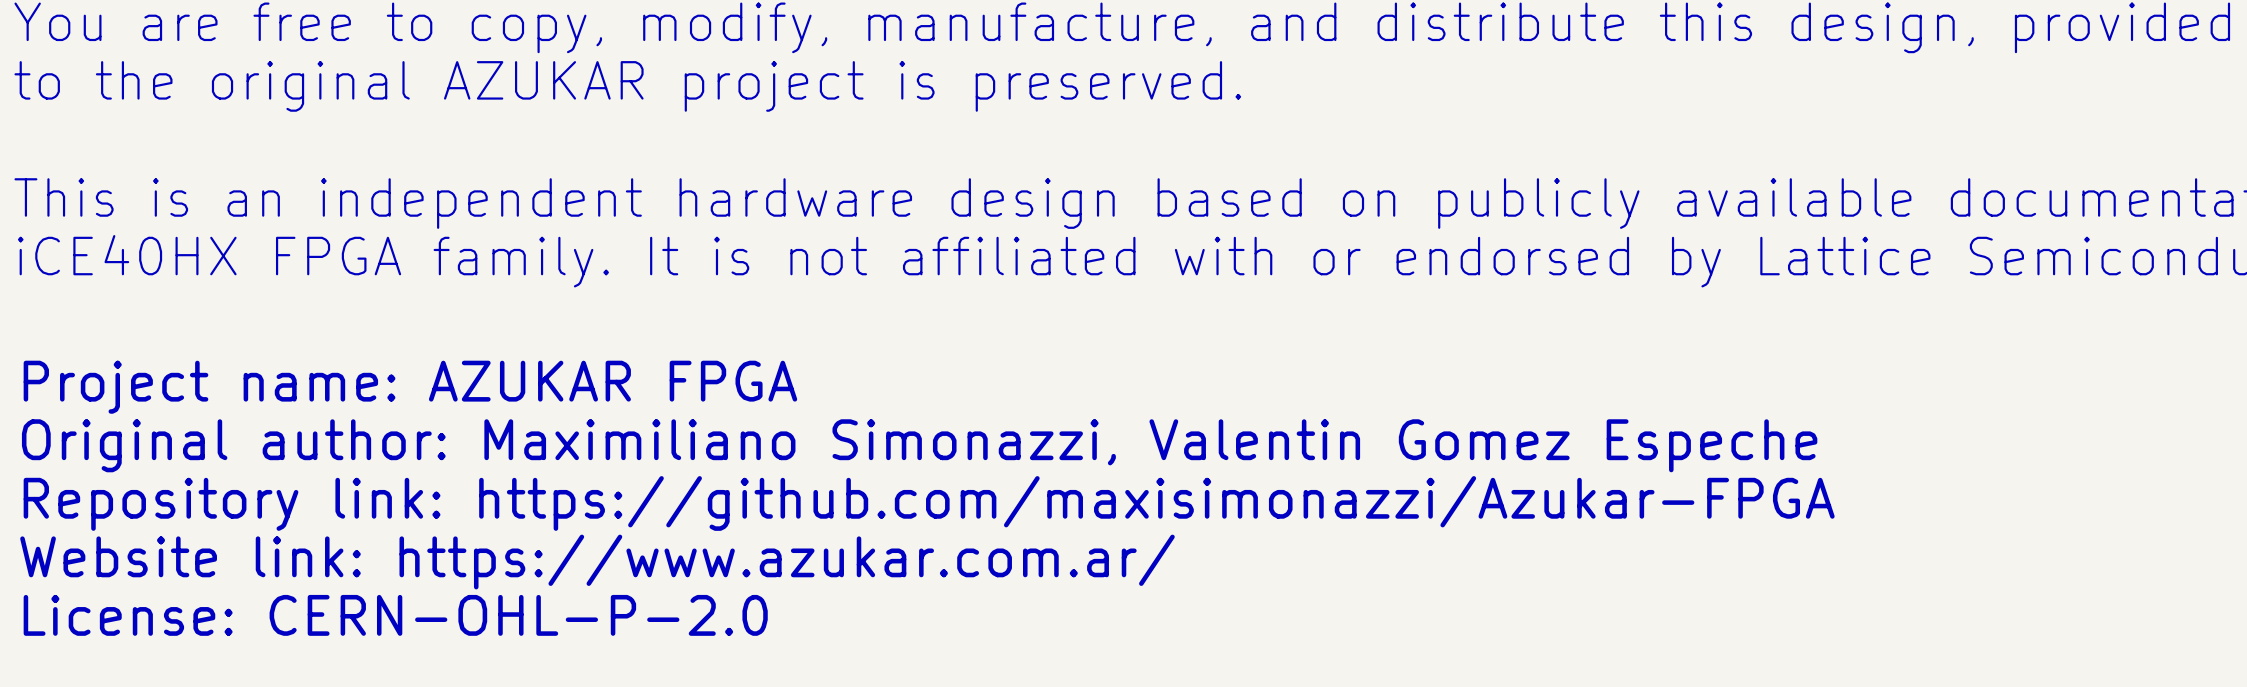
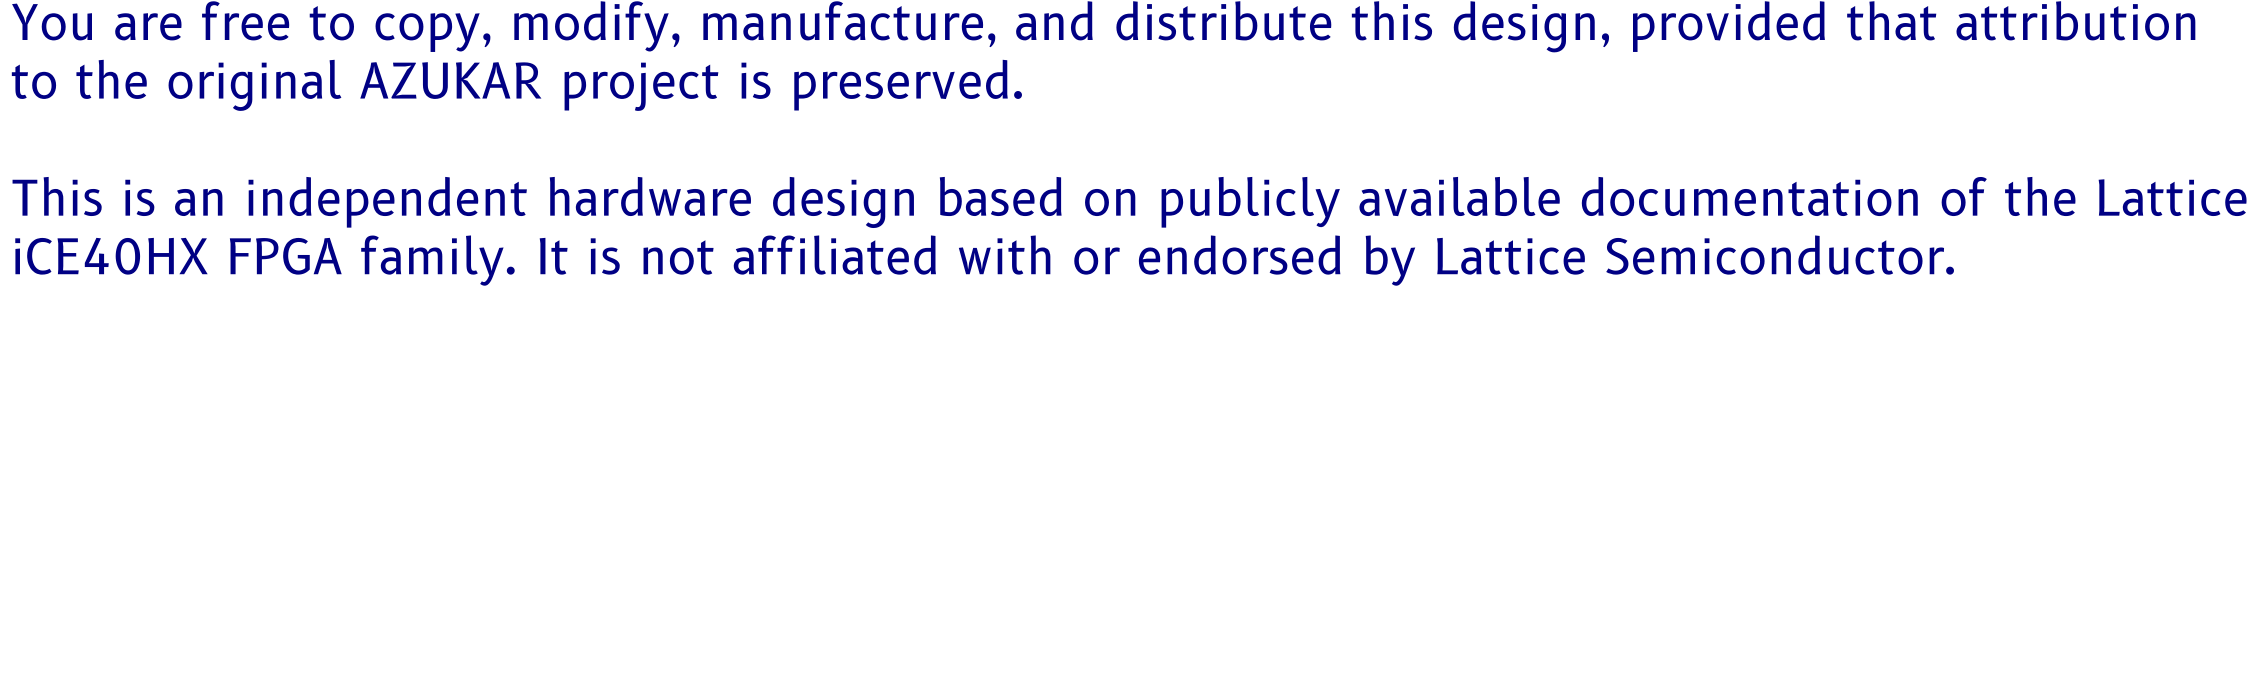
text: Project name: AZUKAR FPGA (410, 387) -> none
text: Original author: Maximiliano Simonazzi, Valentin Gomez Espeche (919, 445) -> none
text: Repository link: https://github.com/maxisimonazzi/Azukar-FPGA (929, 503) -> none
text: Website link: https://www.azukar.com.ar/ (597, 562) -> none
text: License: CERN-OHL-P-2.0 (395, 615) -> none

